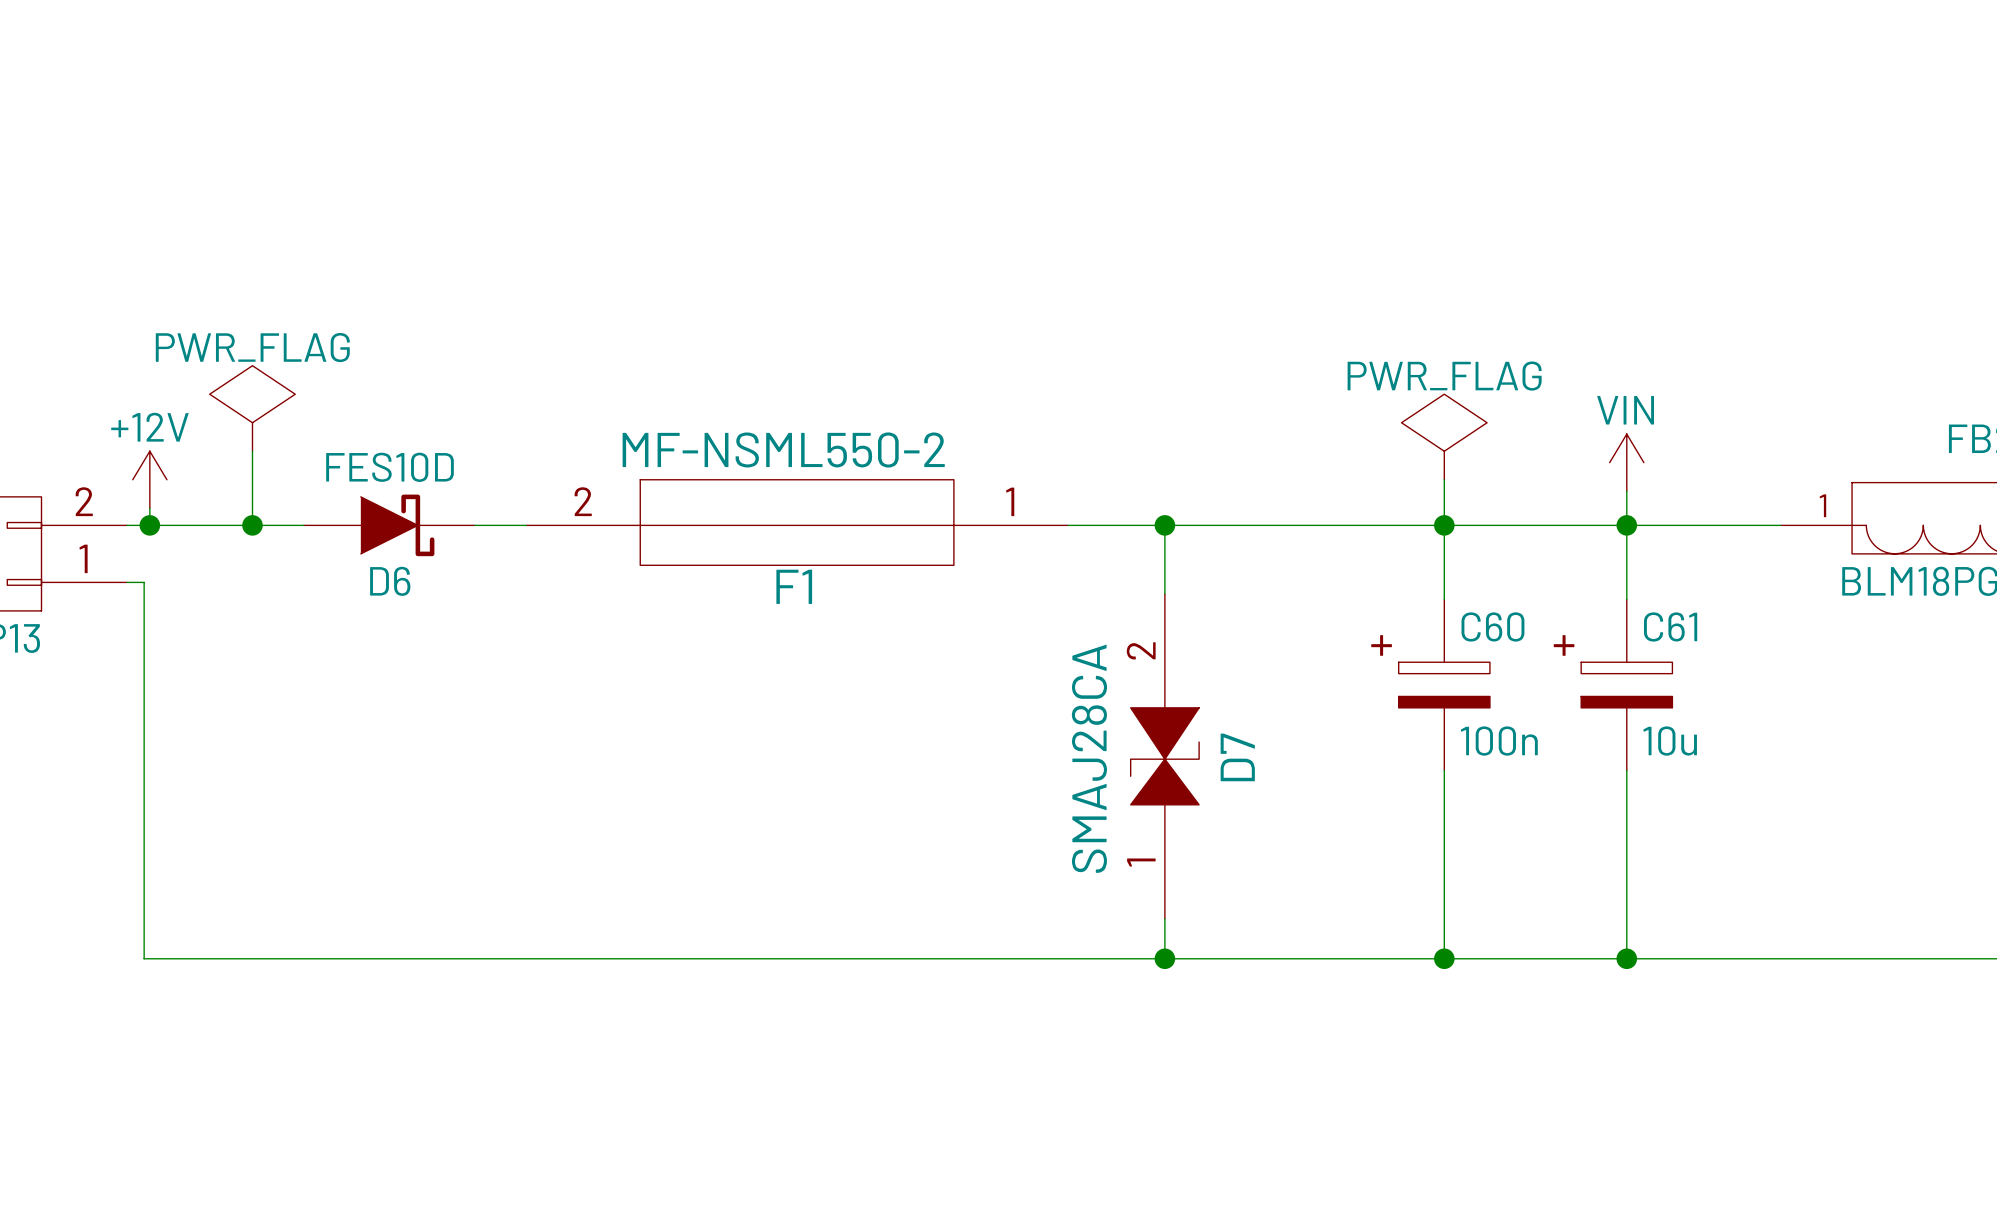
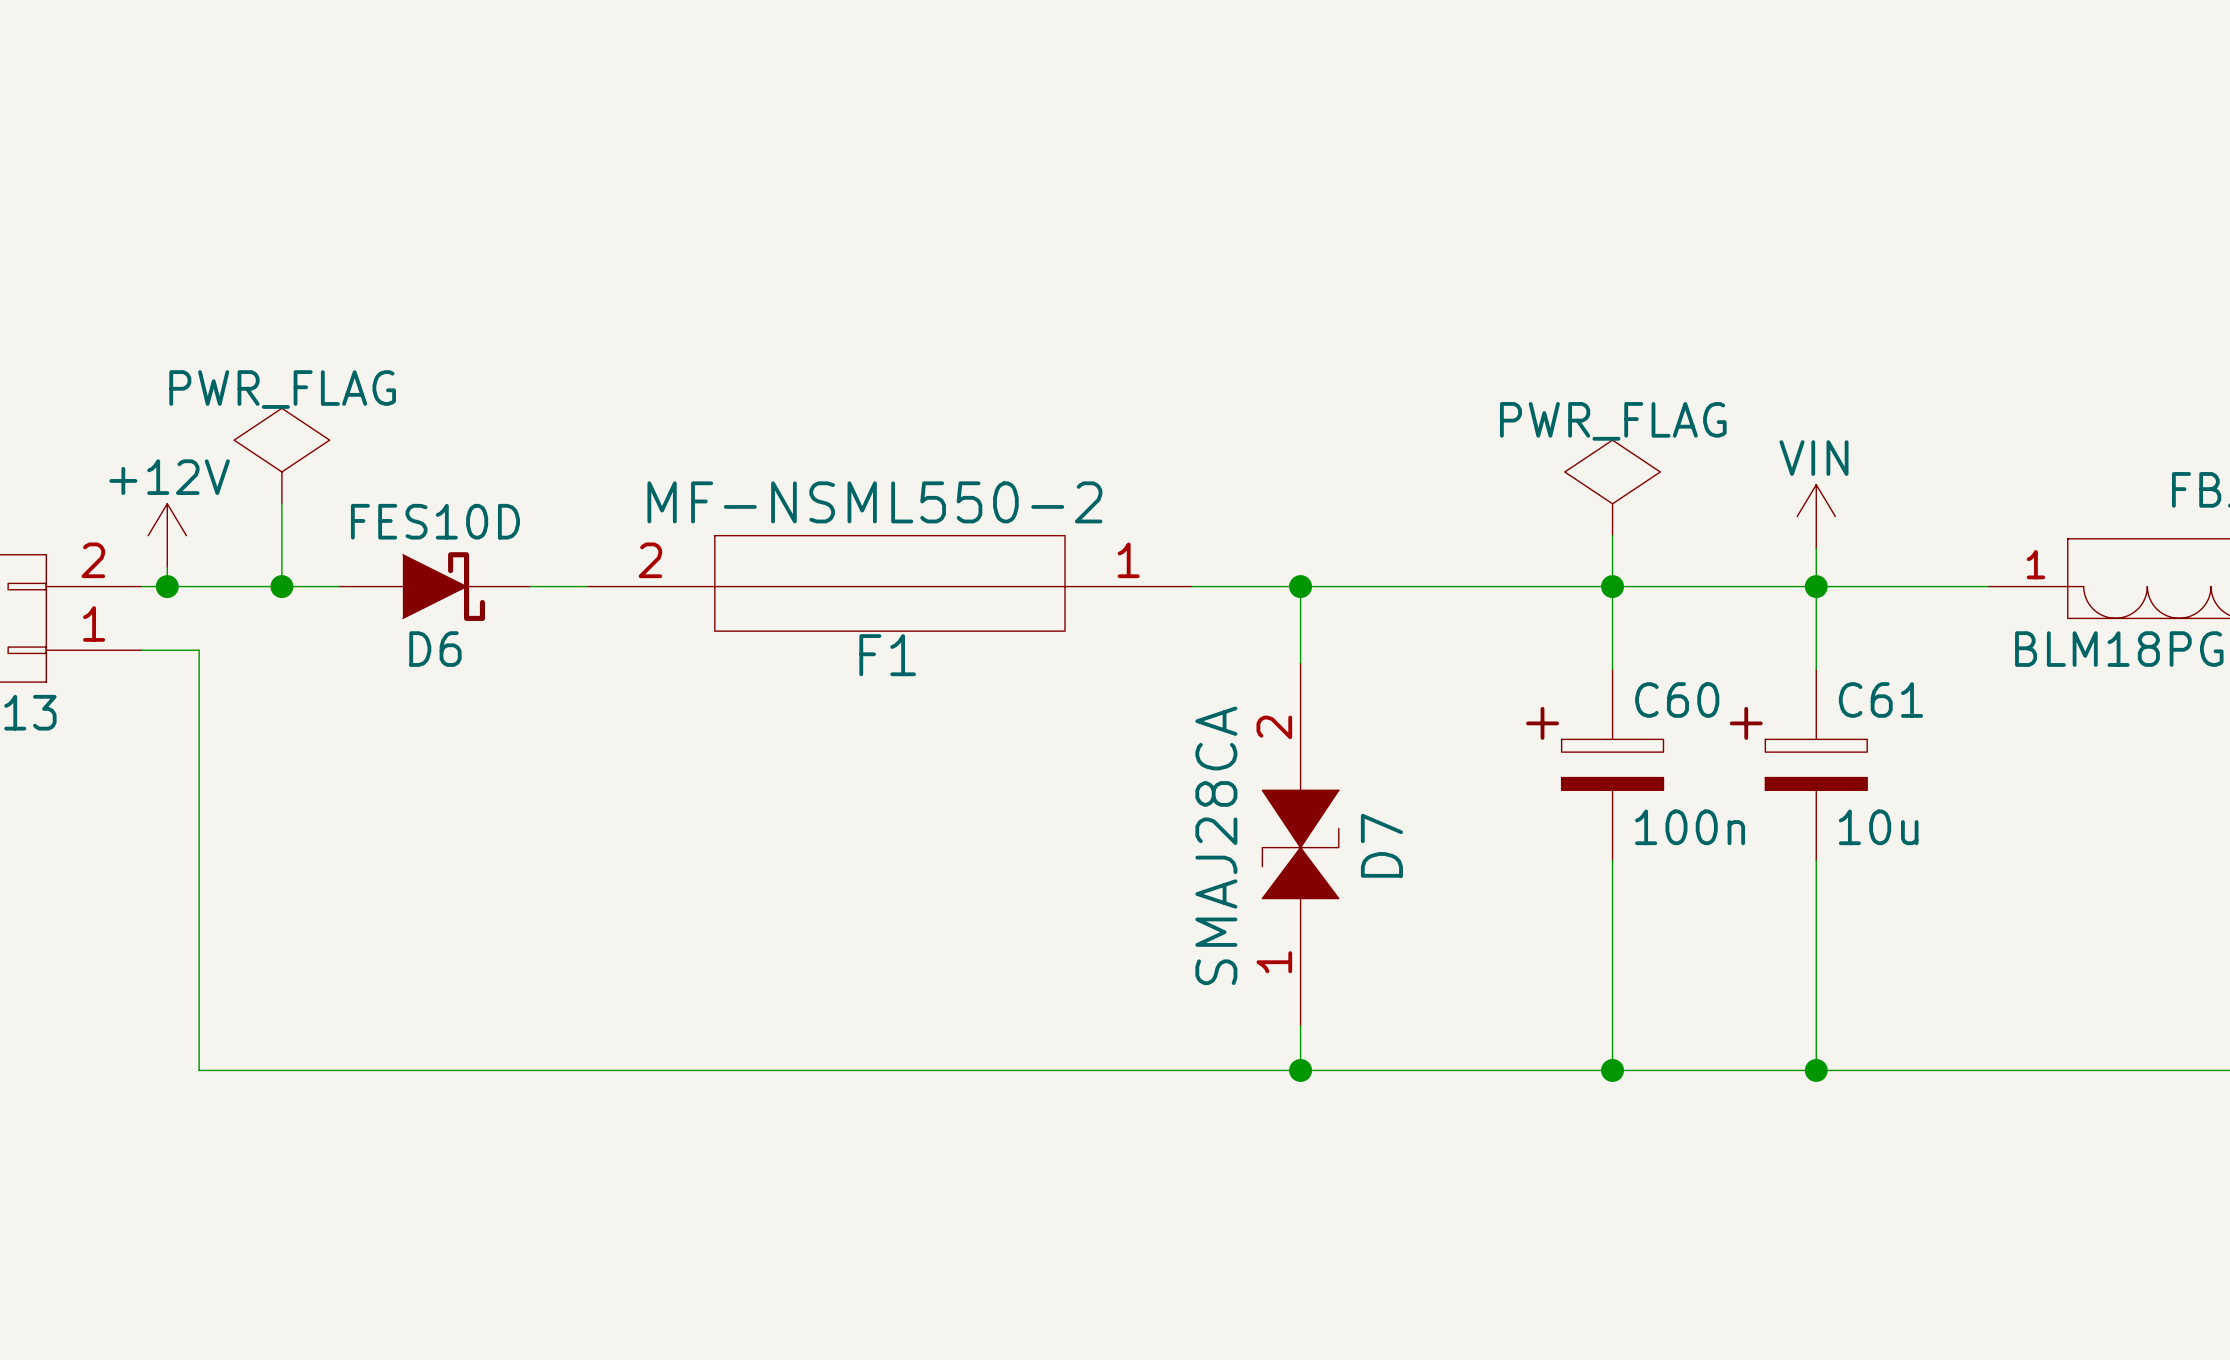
wire: (144, 582) (144, 958) (178, 958) -> (160, 650) (199, 650) (199, 1070)

